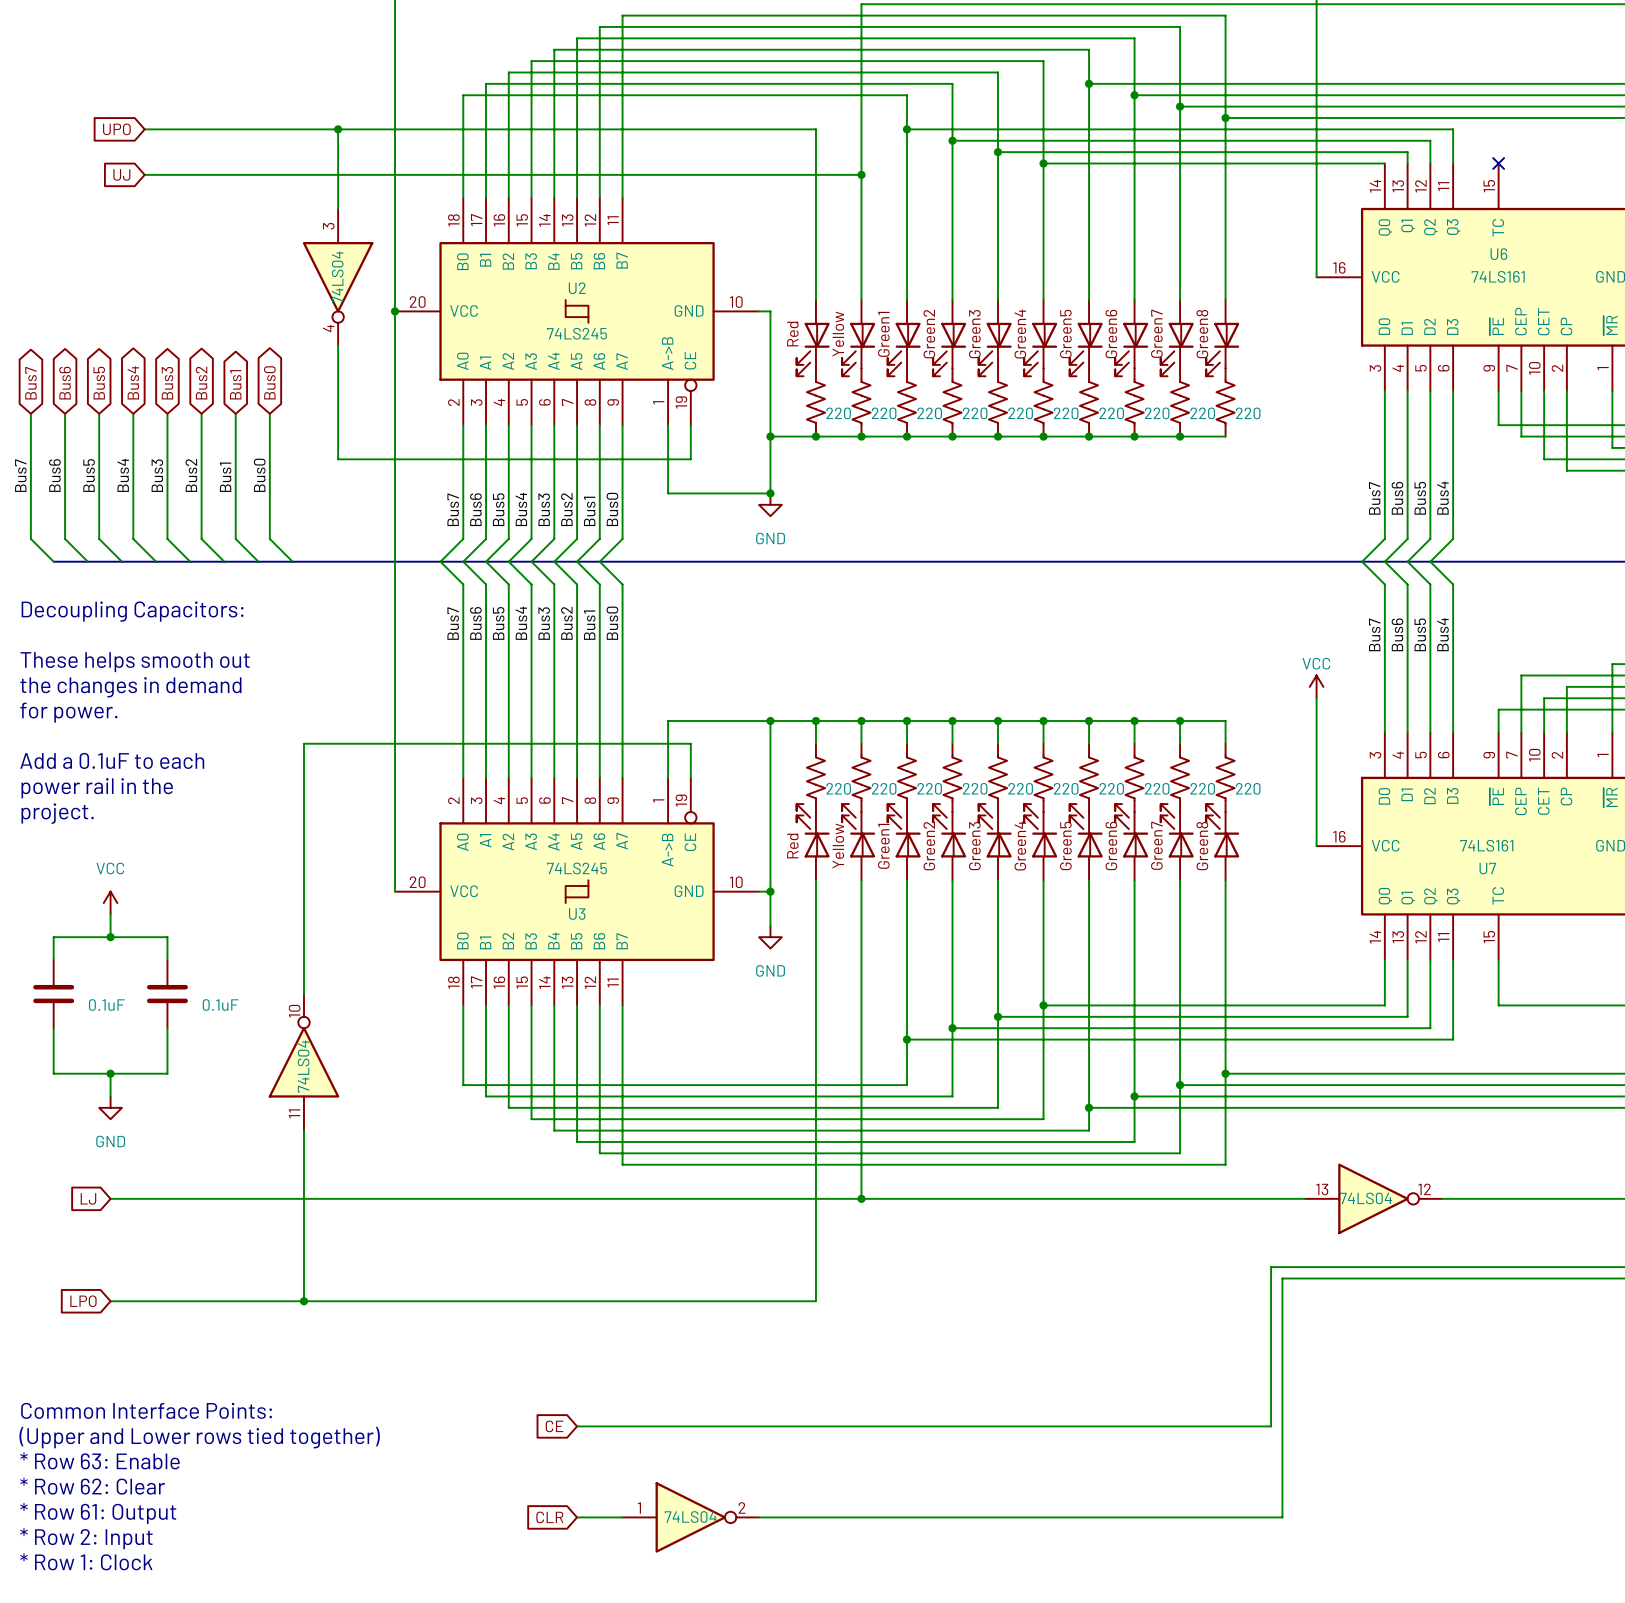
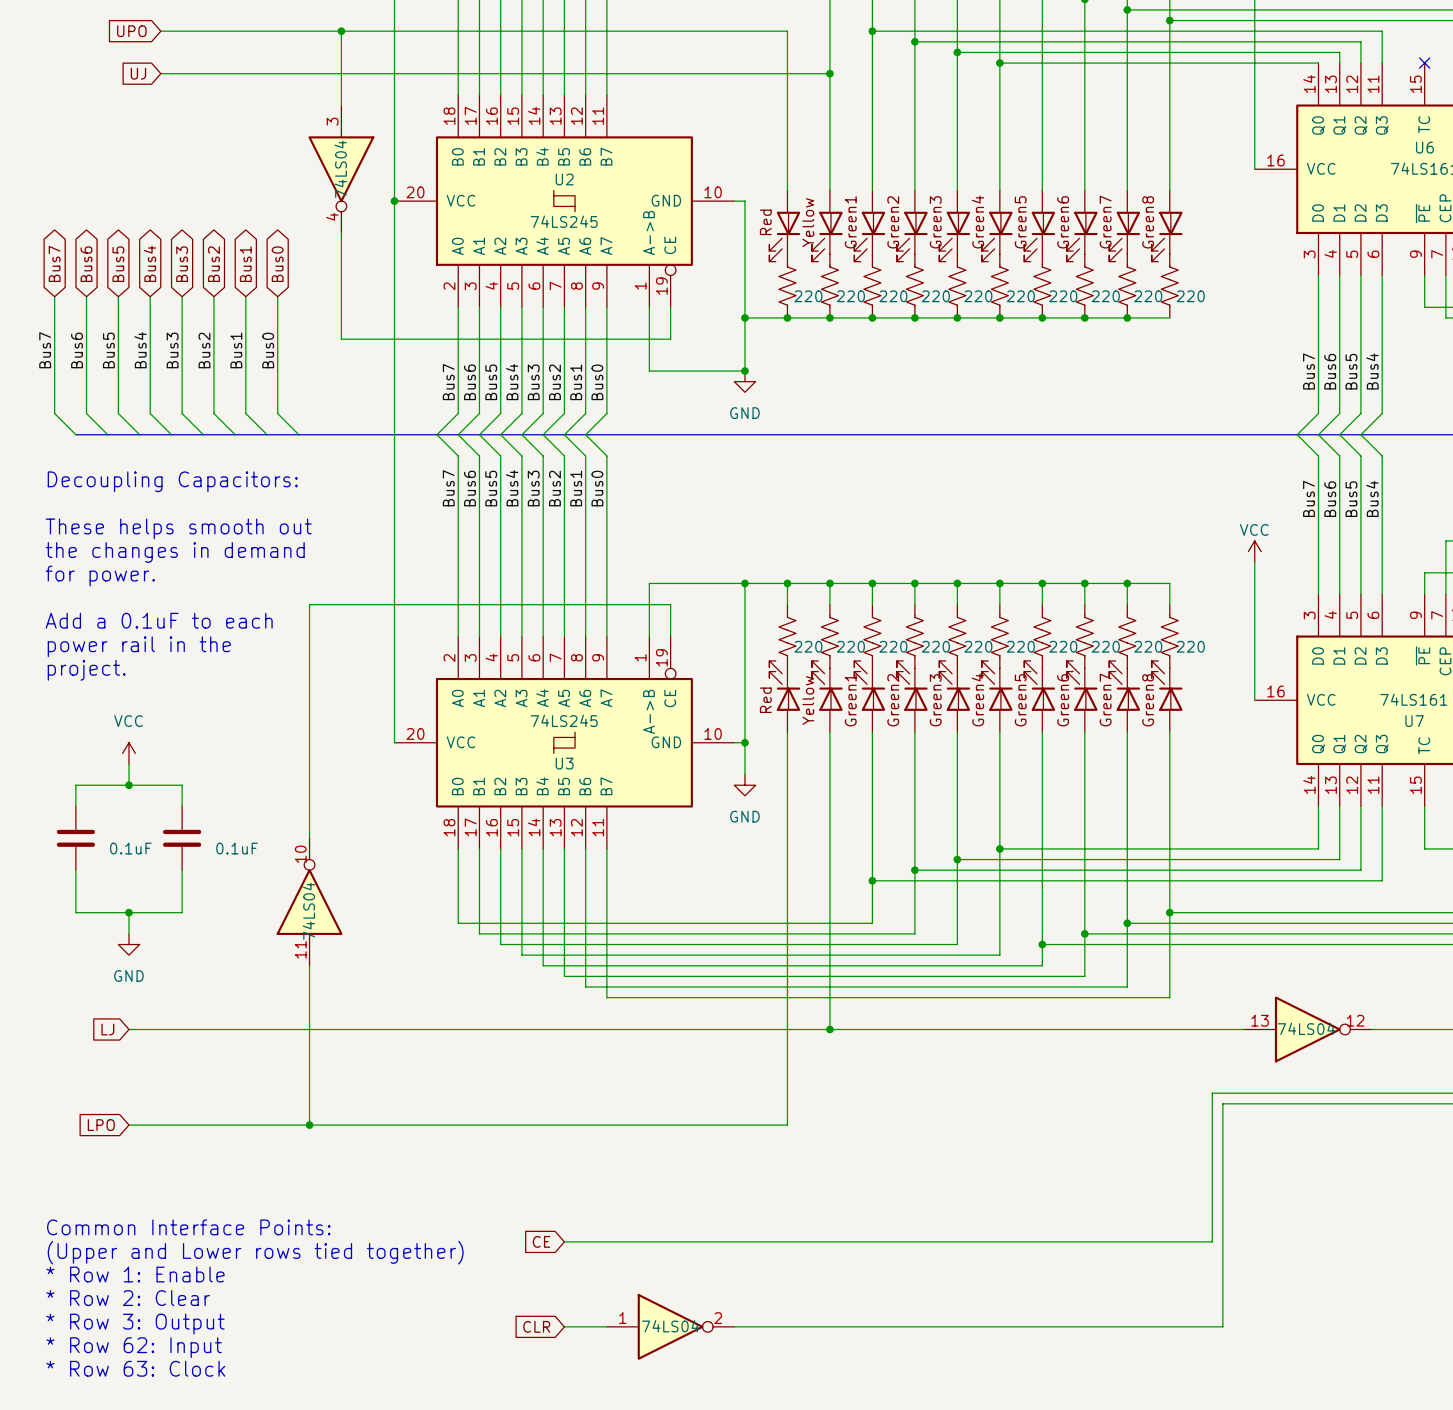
text: * Row 63: Enable (99, 1460) -> * Row 1: Enable (135, 1274)
text: * Row 62: Clear (92, 1486) -> * Row 2: Clear (128, 1298)
text: * Row 61: Output (98, 1513) -> * Row 3: Output (135, 1324)
text: * Row 2: Input (86, 1538) -> * Row 62: Input (134, 1347)
text: * Row 1: Clock (86, 1561) -> * Row 63: Clock (135, 1368)

